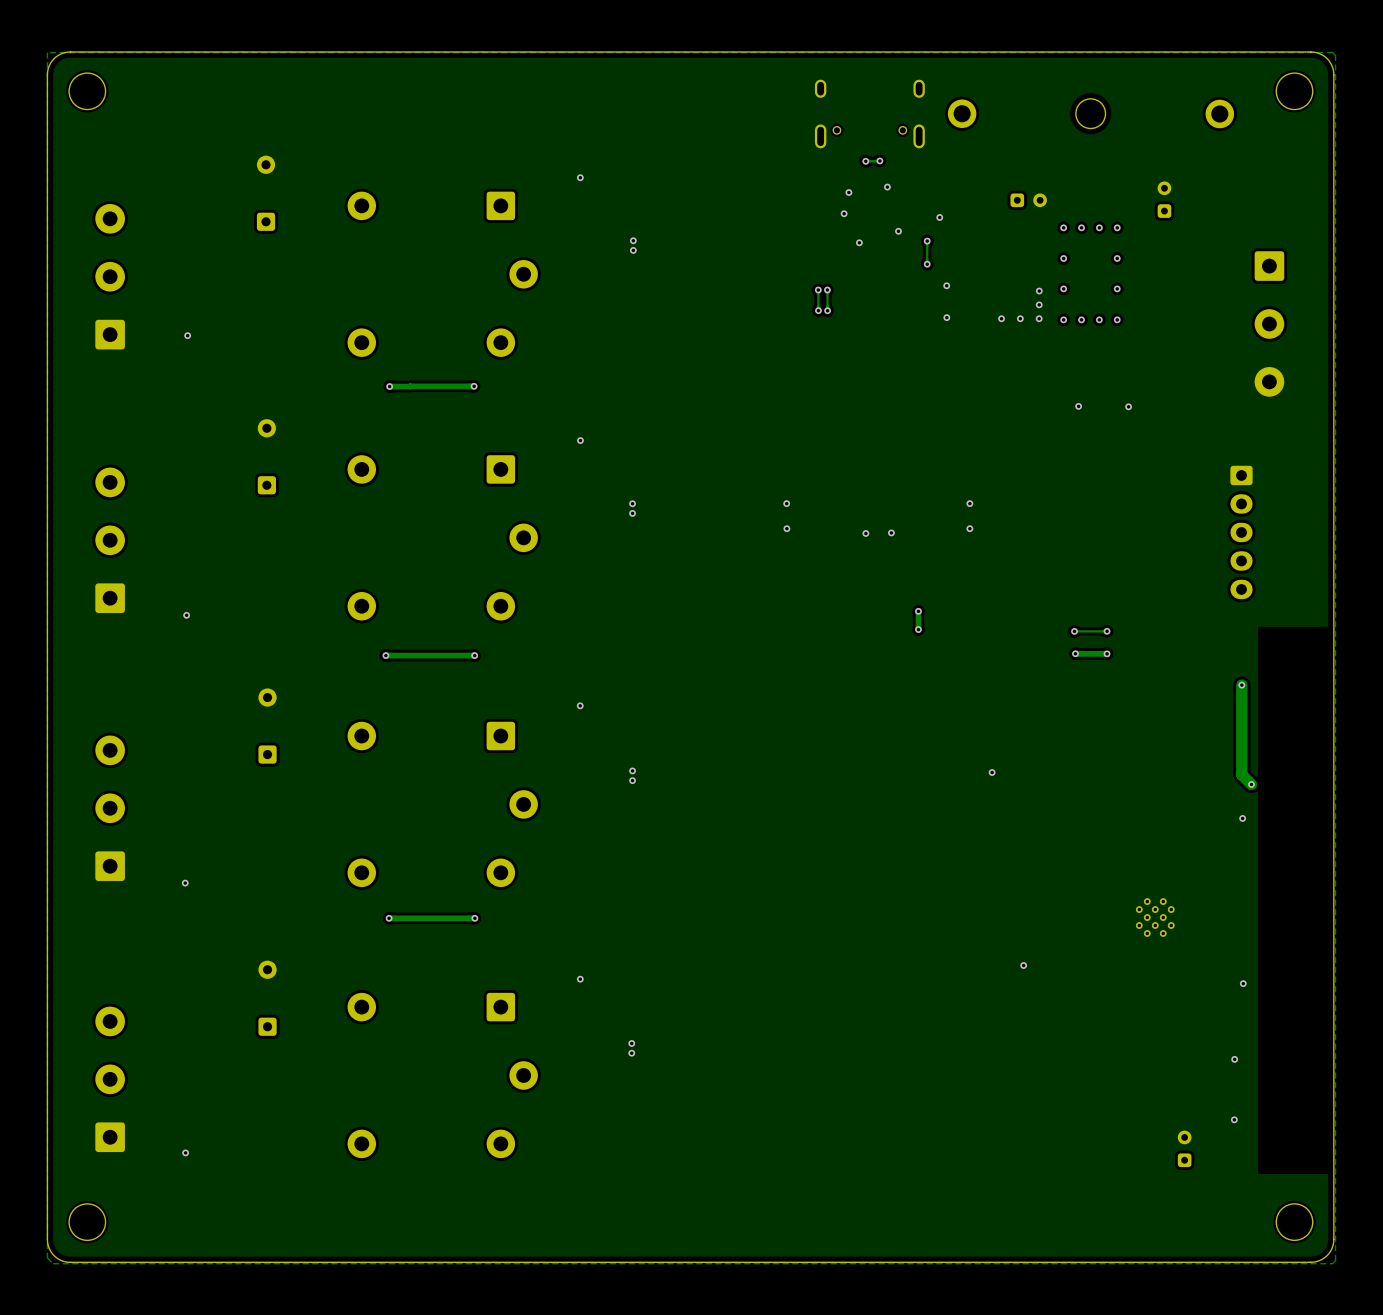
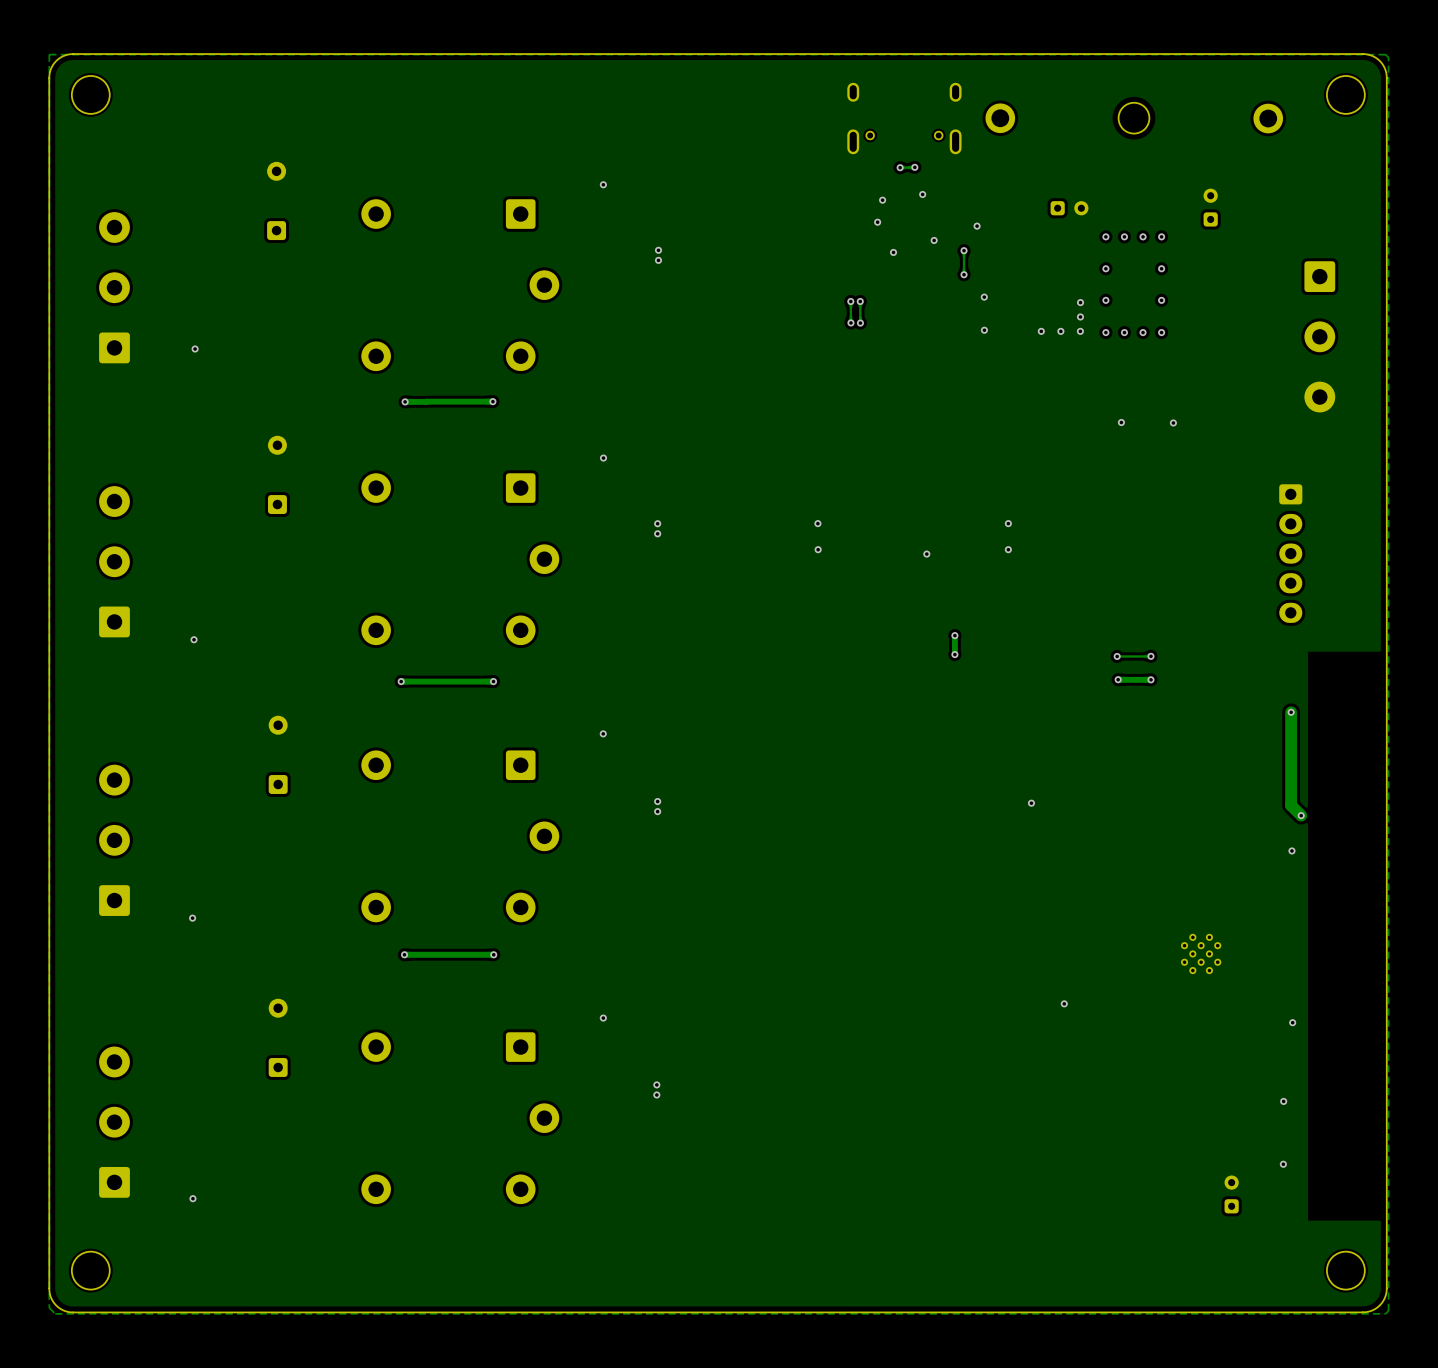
via: (865, 533) -> none

